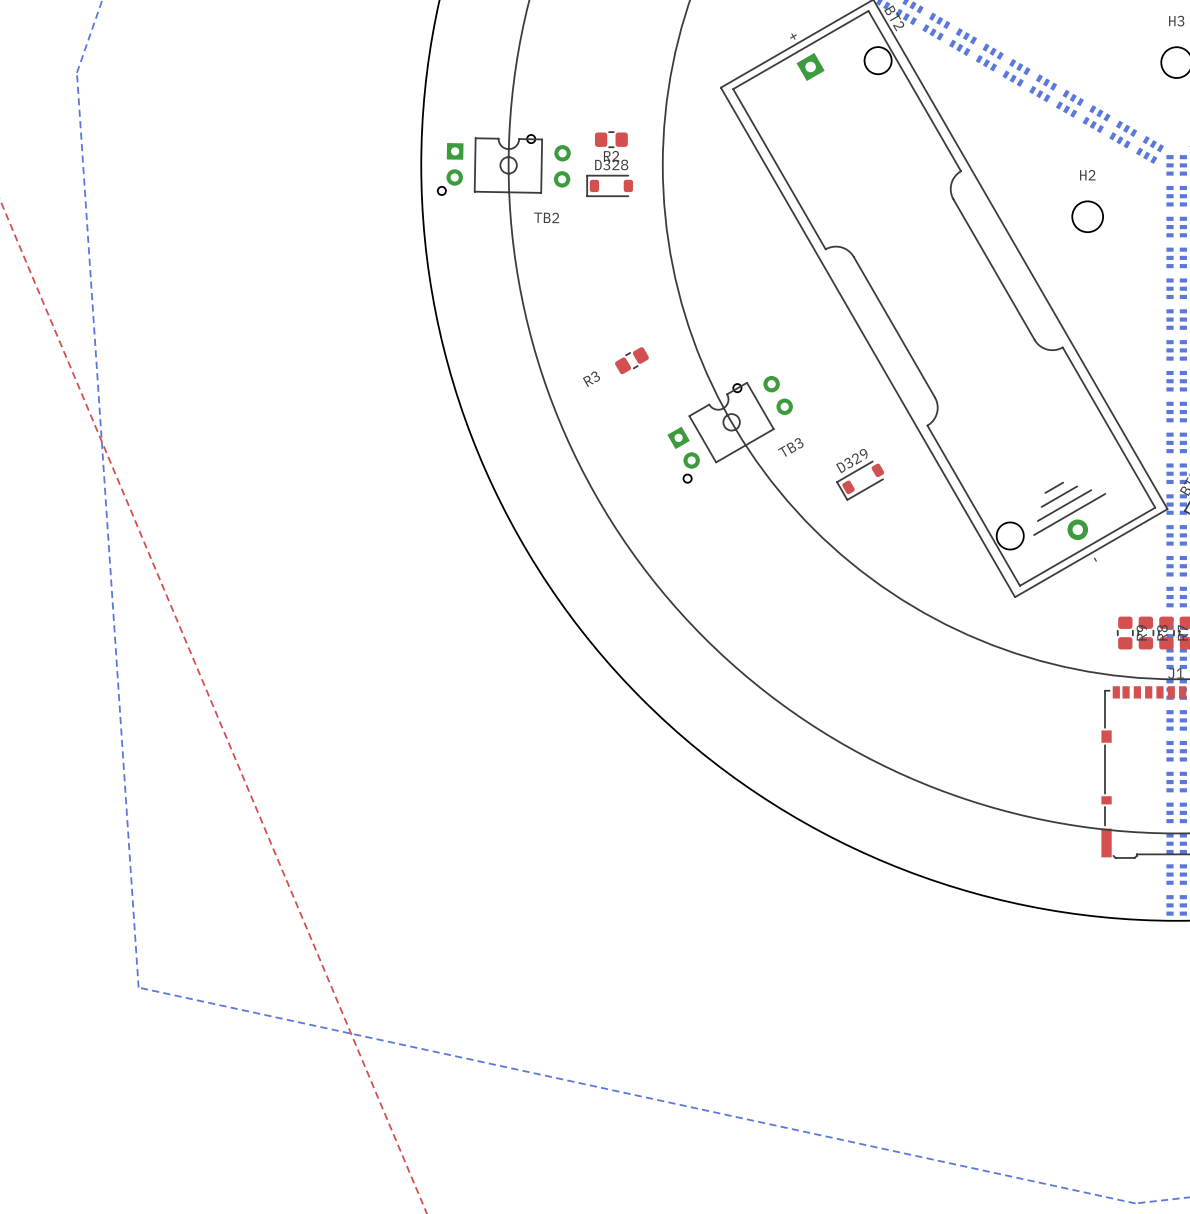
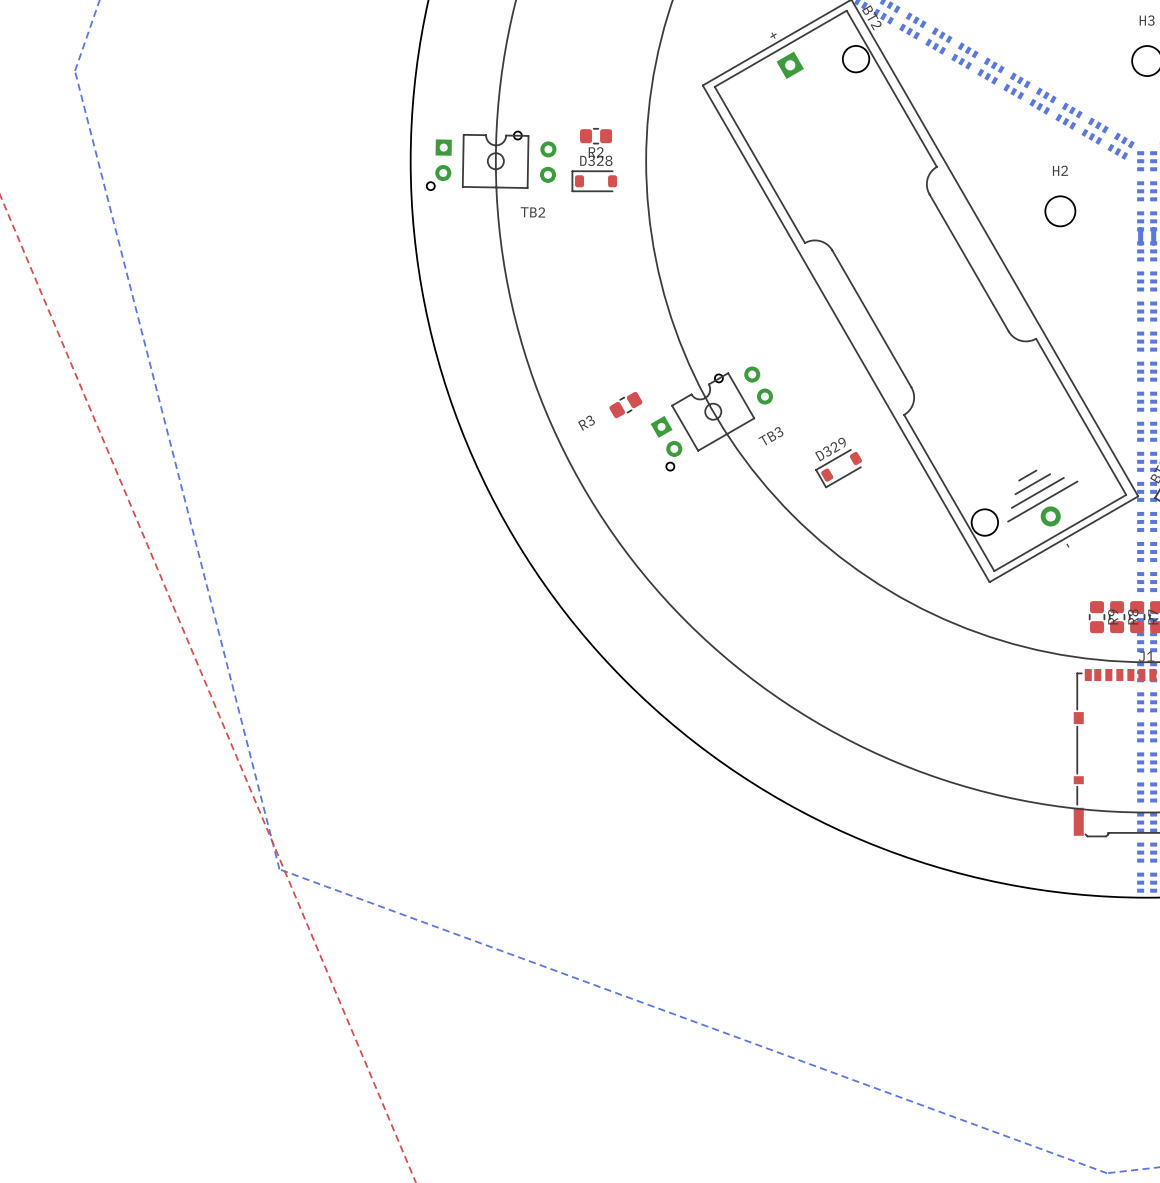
bottom zone outline: (76, 72) (138, 987) (1135, 1203) -> (75, 71) (279, 869) (1107, 1173)
bottom track: none -> (1140, 229) (1140, 243)
bottom track: none -> (1153, 229) (1153, 243)
R3 position: (631, 360) -> (625, 405)

